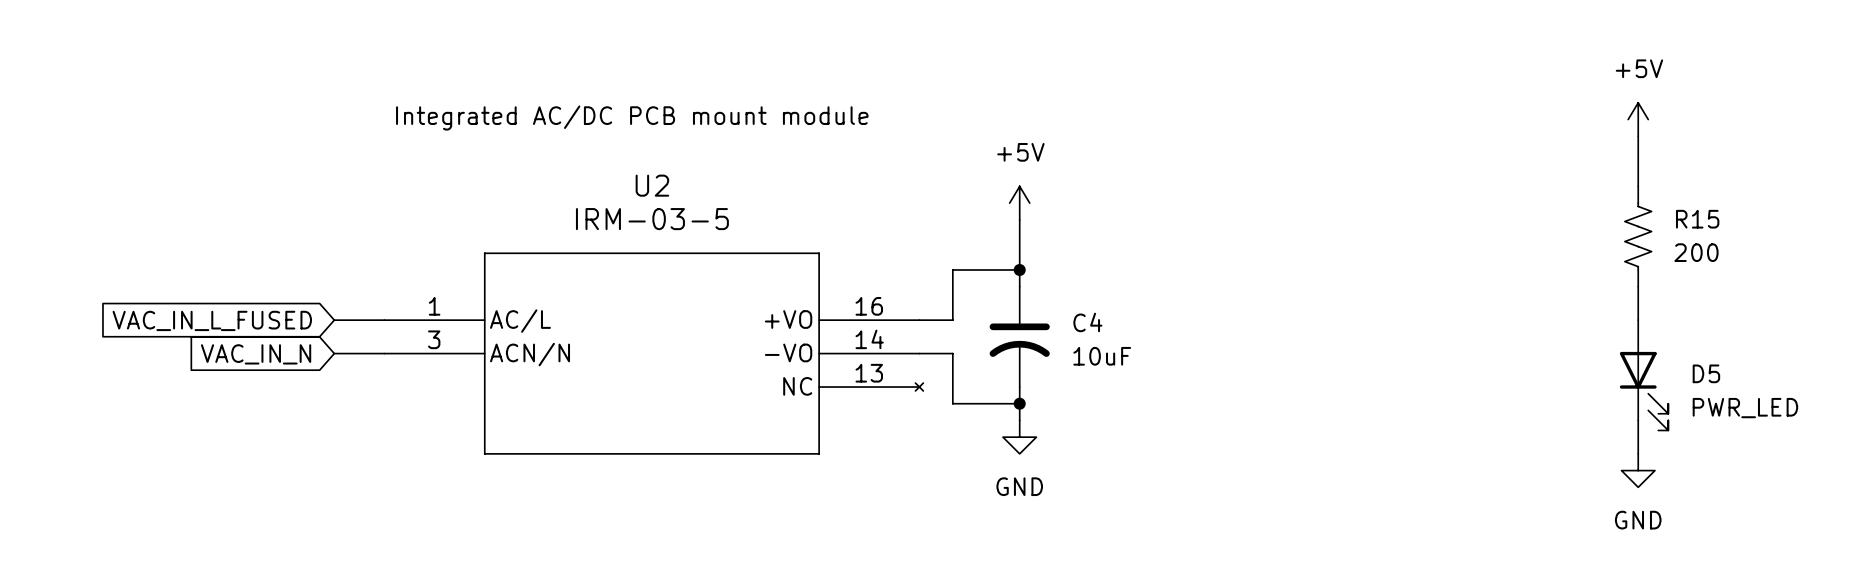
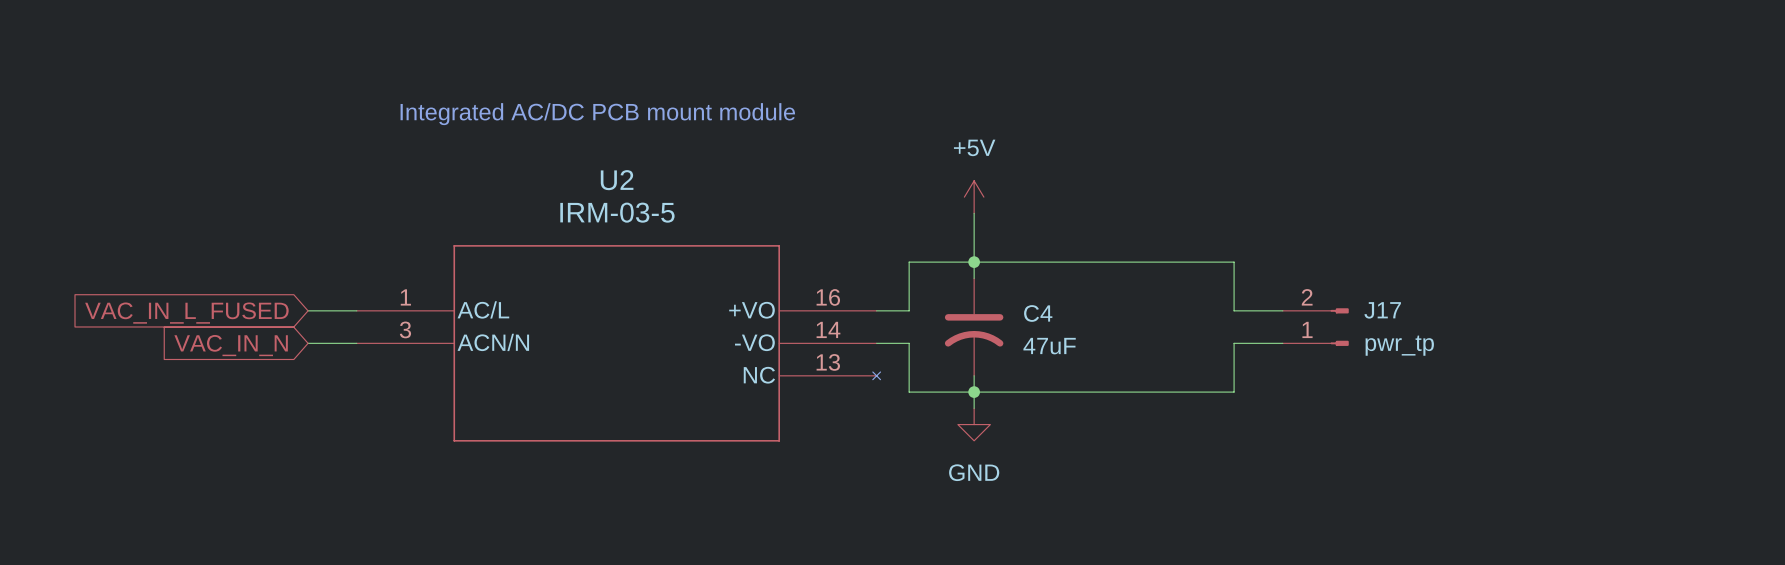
power symbol: +5V (1638, 119) -> none
wire: (1638, 136) (1638, 186) -> none
R15: 200 (1638, 236) -> none
wire: none -> (974, 262) (1234, 262) (1234, 310) (1282, 310)
wire: (1638, 286) (1638, 320) -> none
J17: none -> pwr_tp (1315, 327)
wire: none -> (1282, 343) (1234, 343) (1234, 392) (974, 392)
C4 value: 10uF (1102, 356) -> 47uF (1049, 346)
D5: PWR_LED (1644, 375) -> none
wire: (1638, 420) (1638, 453) -> none
power symbol: GND (1638, 470) -> none

